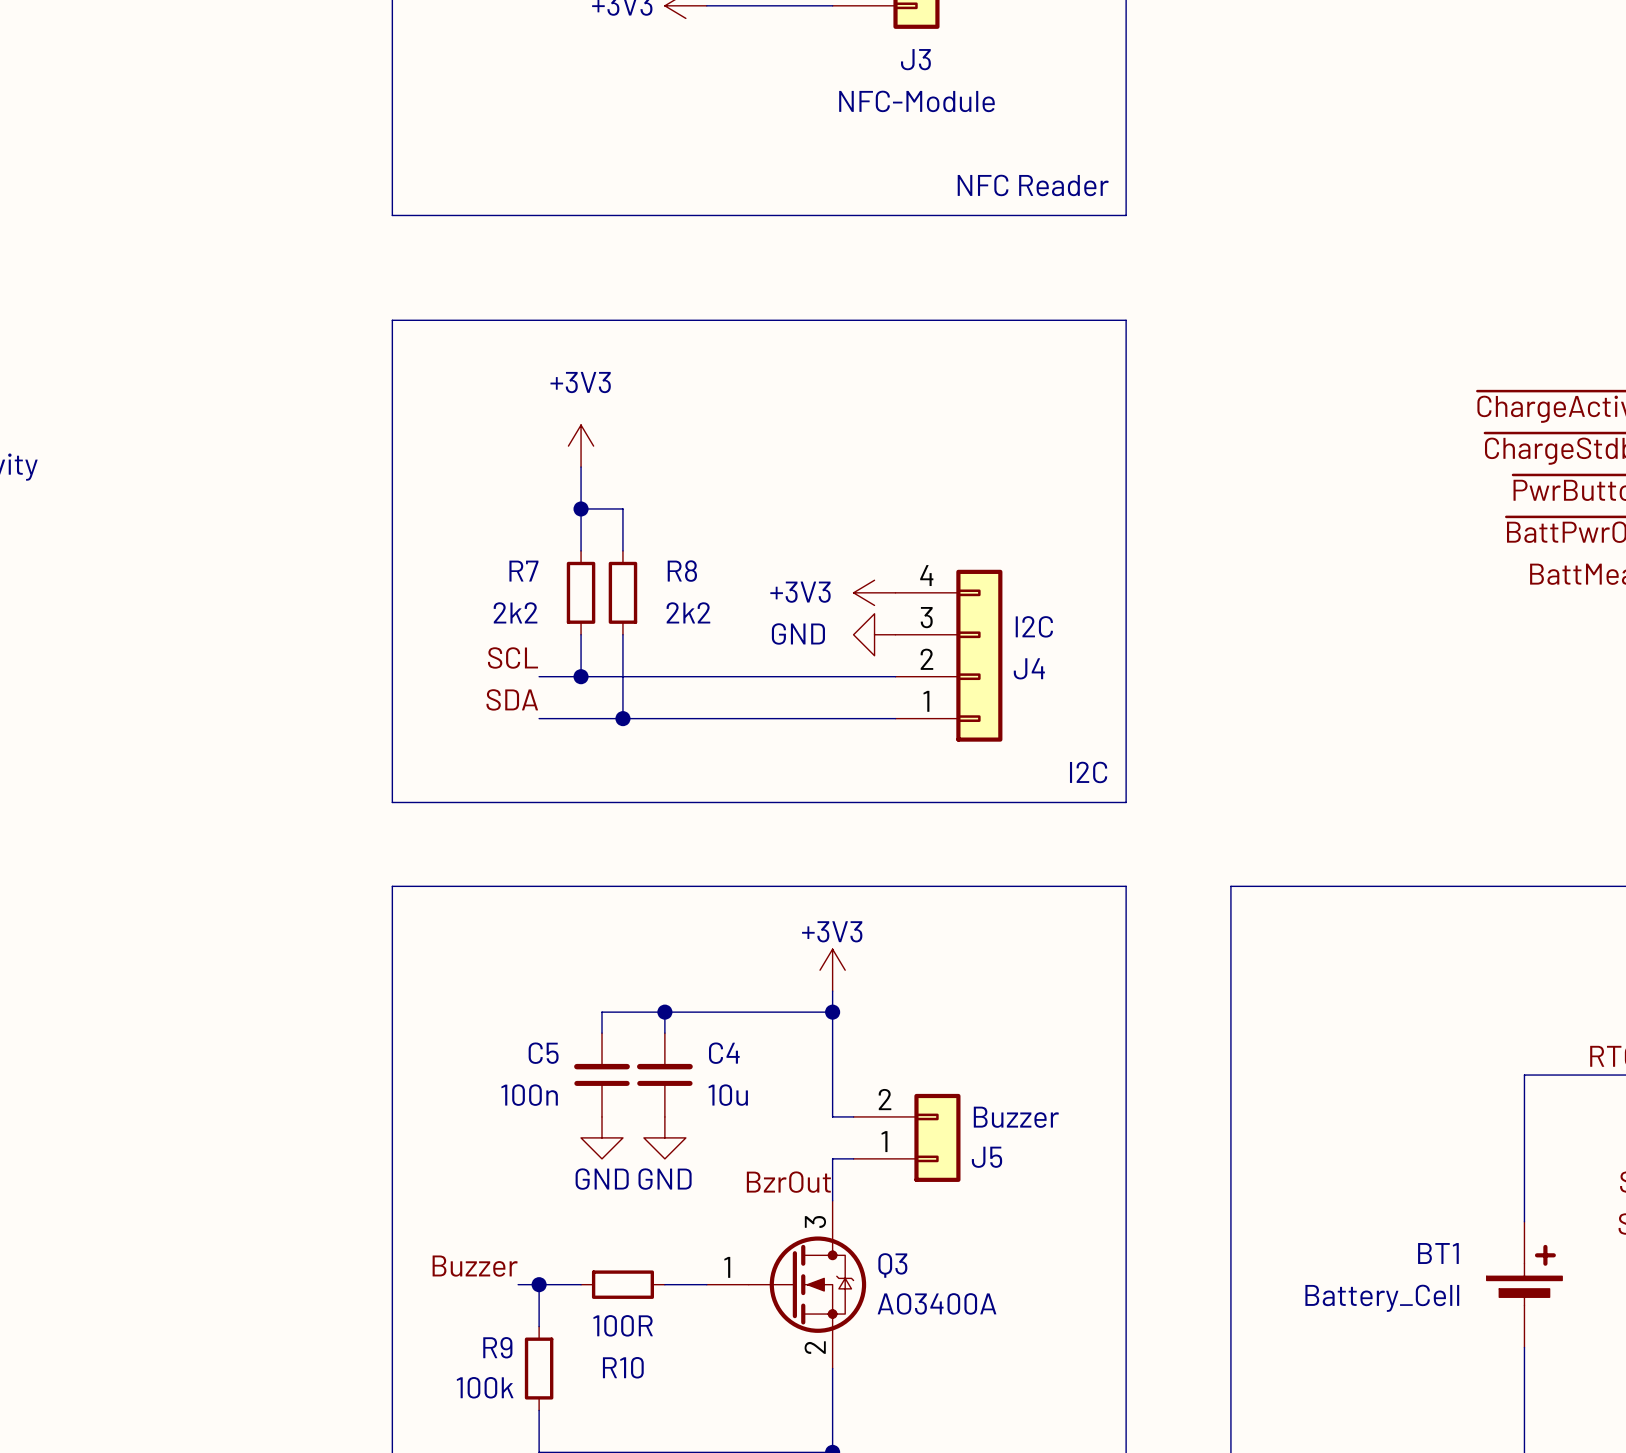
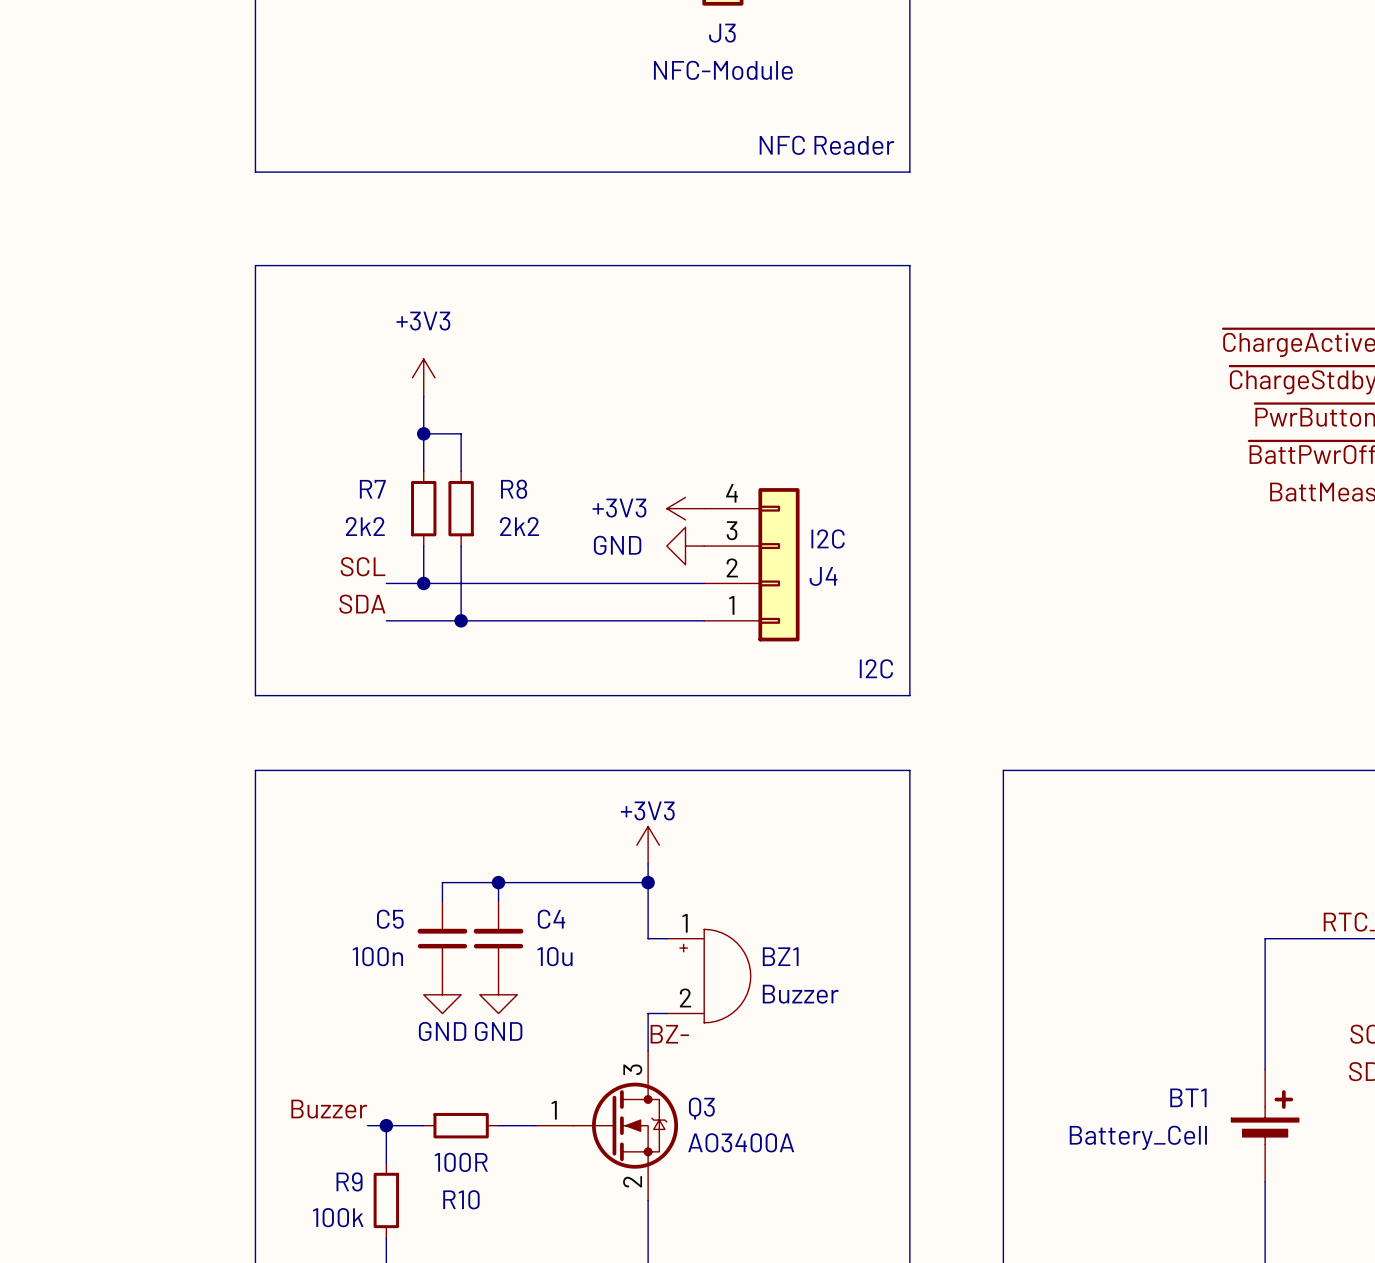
wire: (832, 1075) (832, 1116) (853, 1116) -> (648, 938) (666, 938)
BZ1: none -> Buzzer (708, 976)
J5: Buzzer (907, 1137) -> none
label: BzrOut (788, 1182) -> BZ- (669, 1034)

